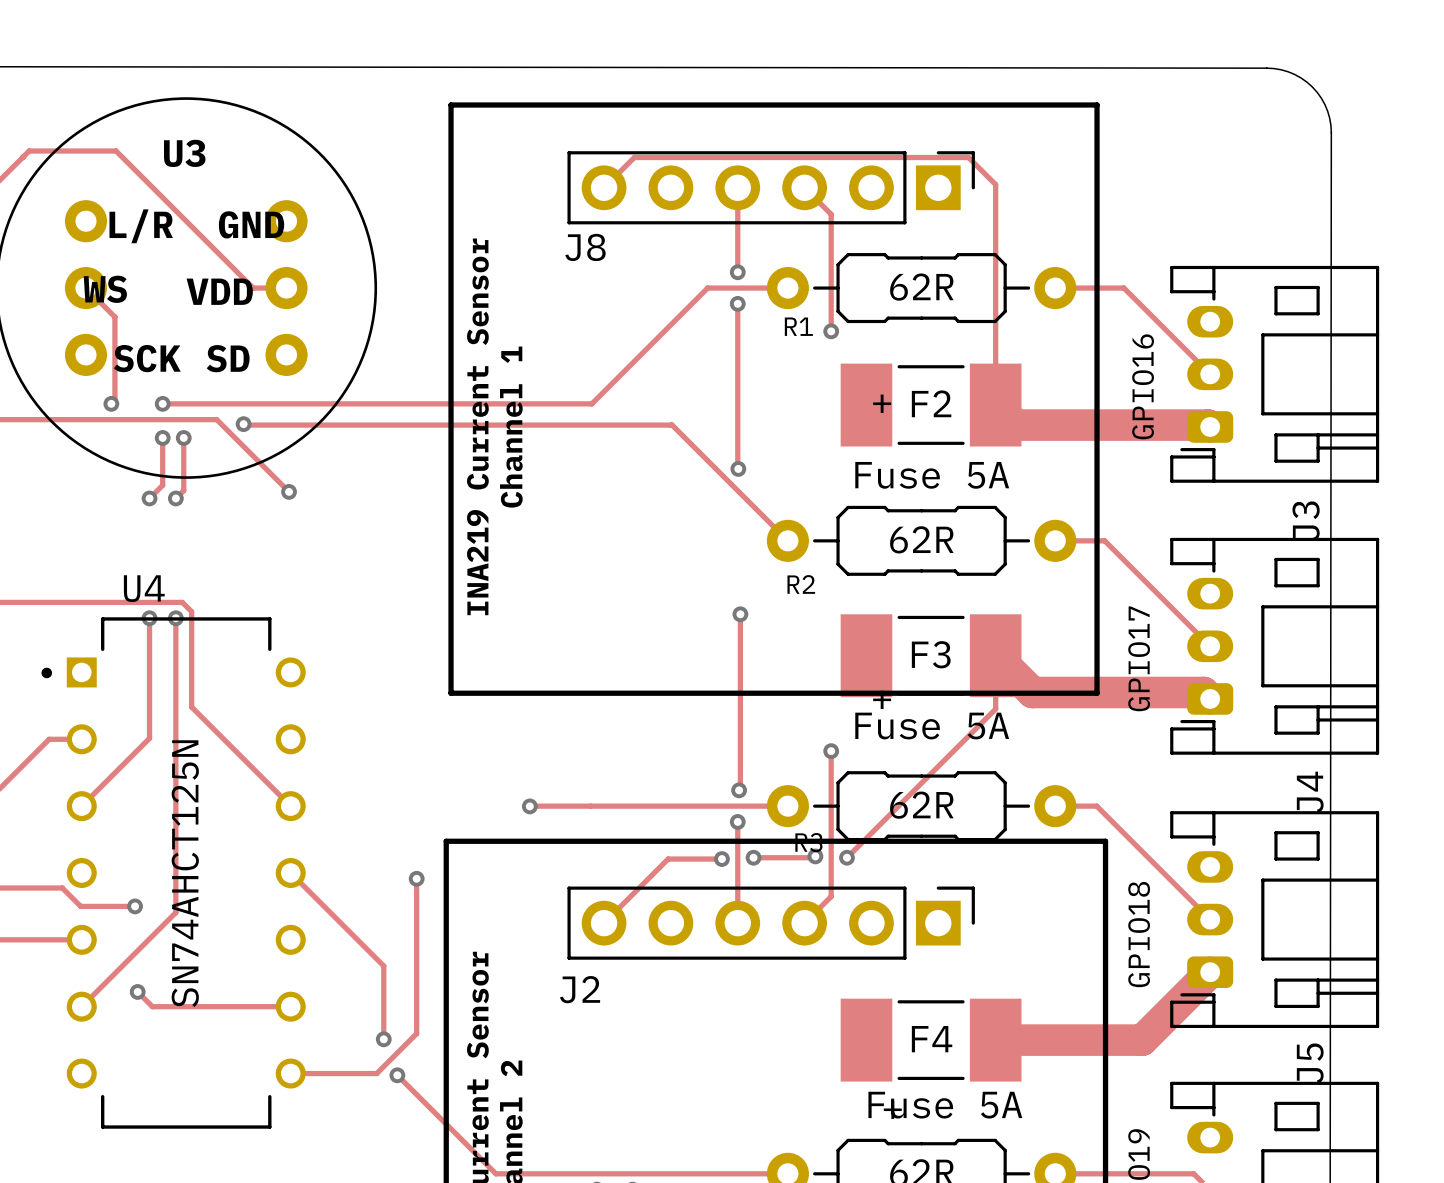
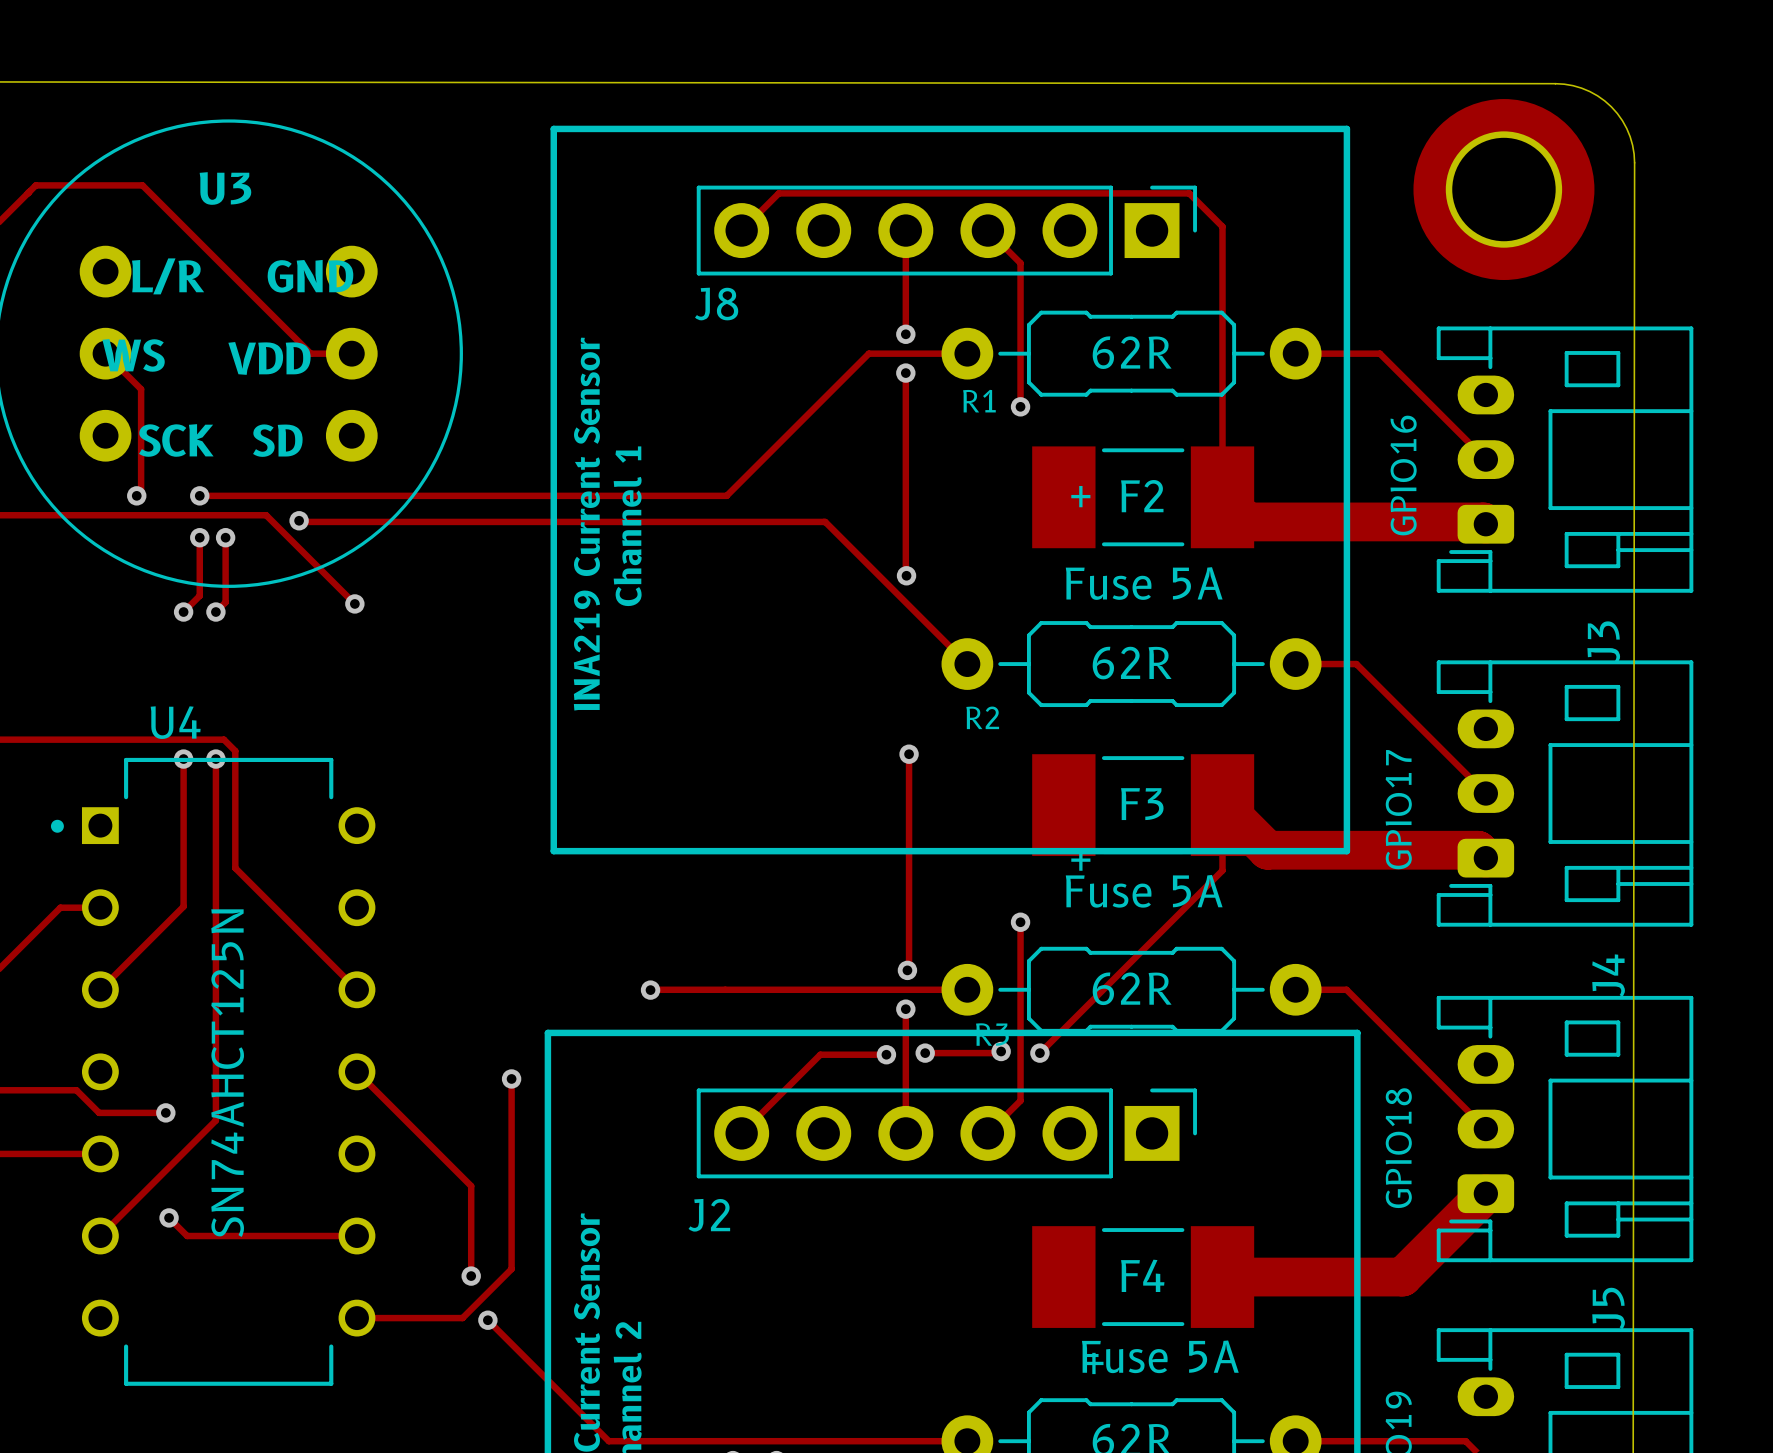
part: none -> (1503, 189)

